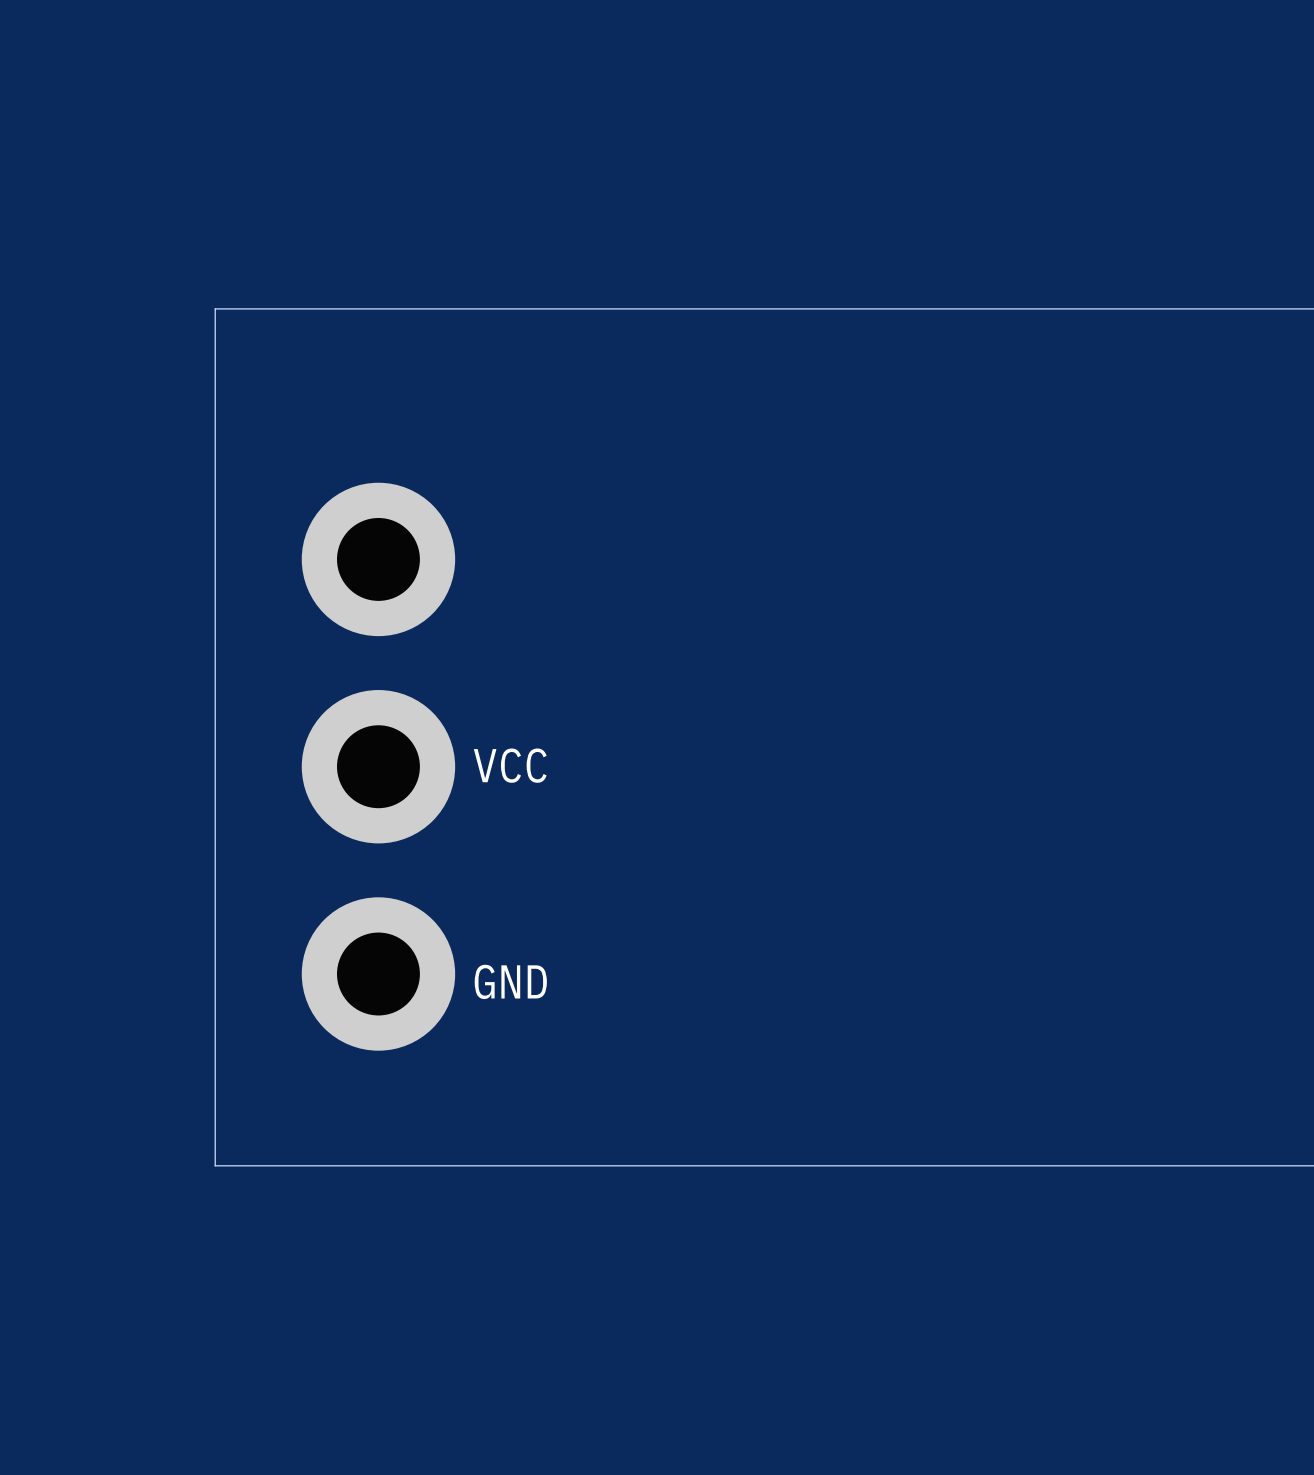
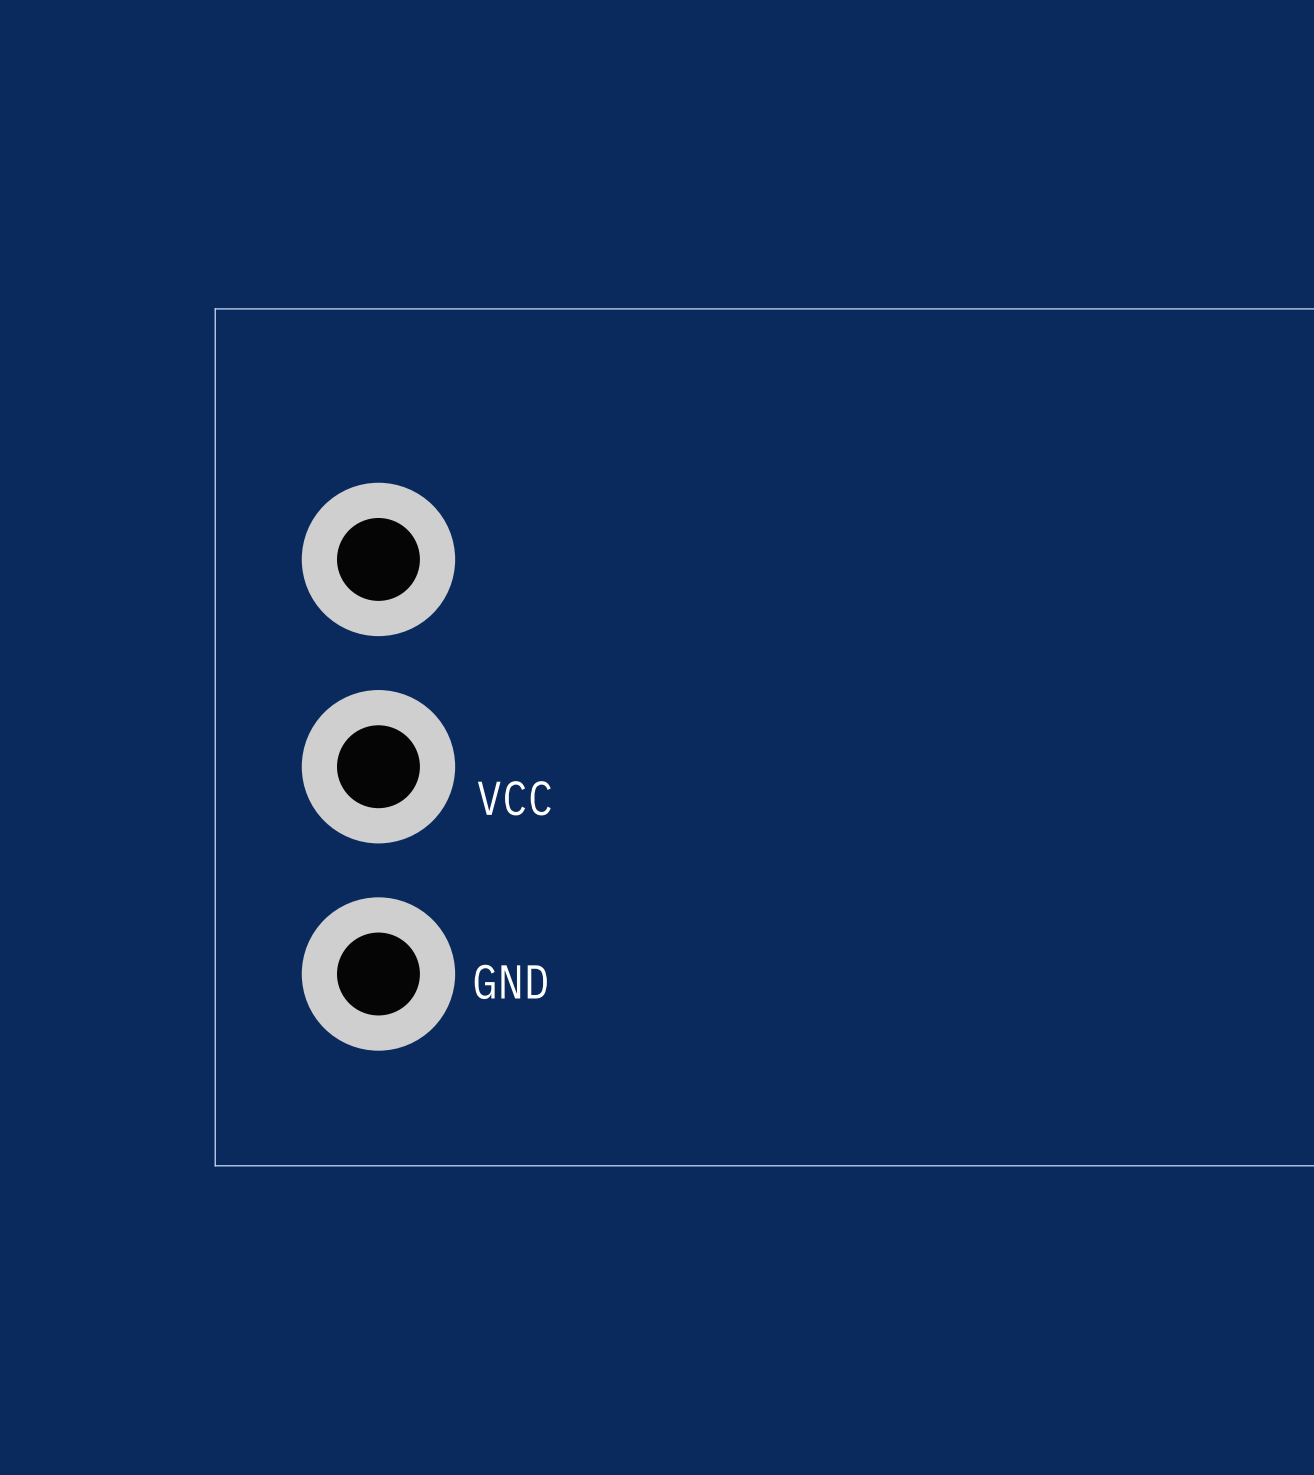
text position: VCC (510, 765) -> VCC (514, 798)

